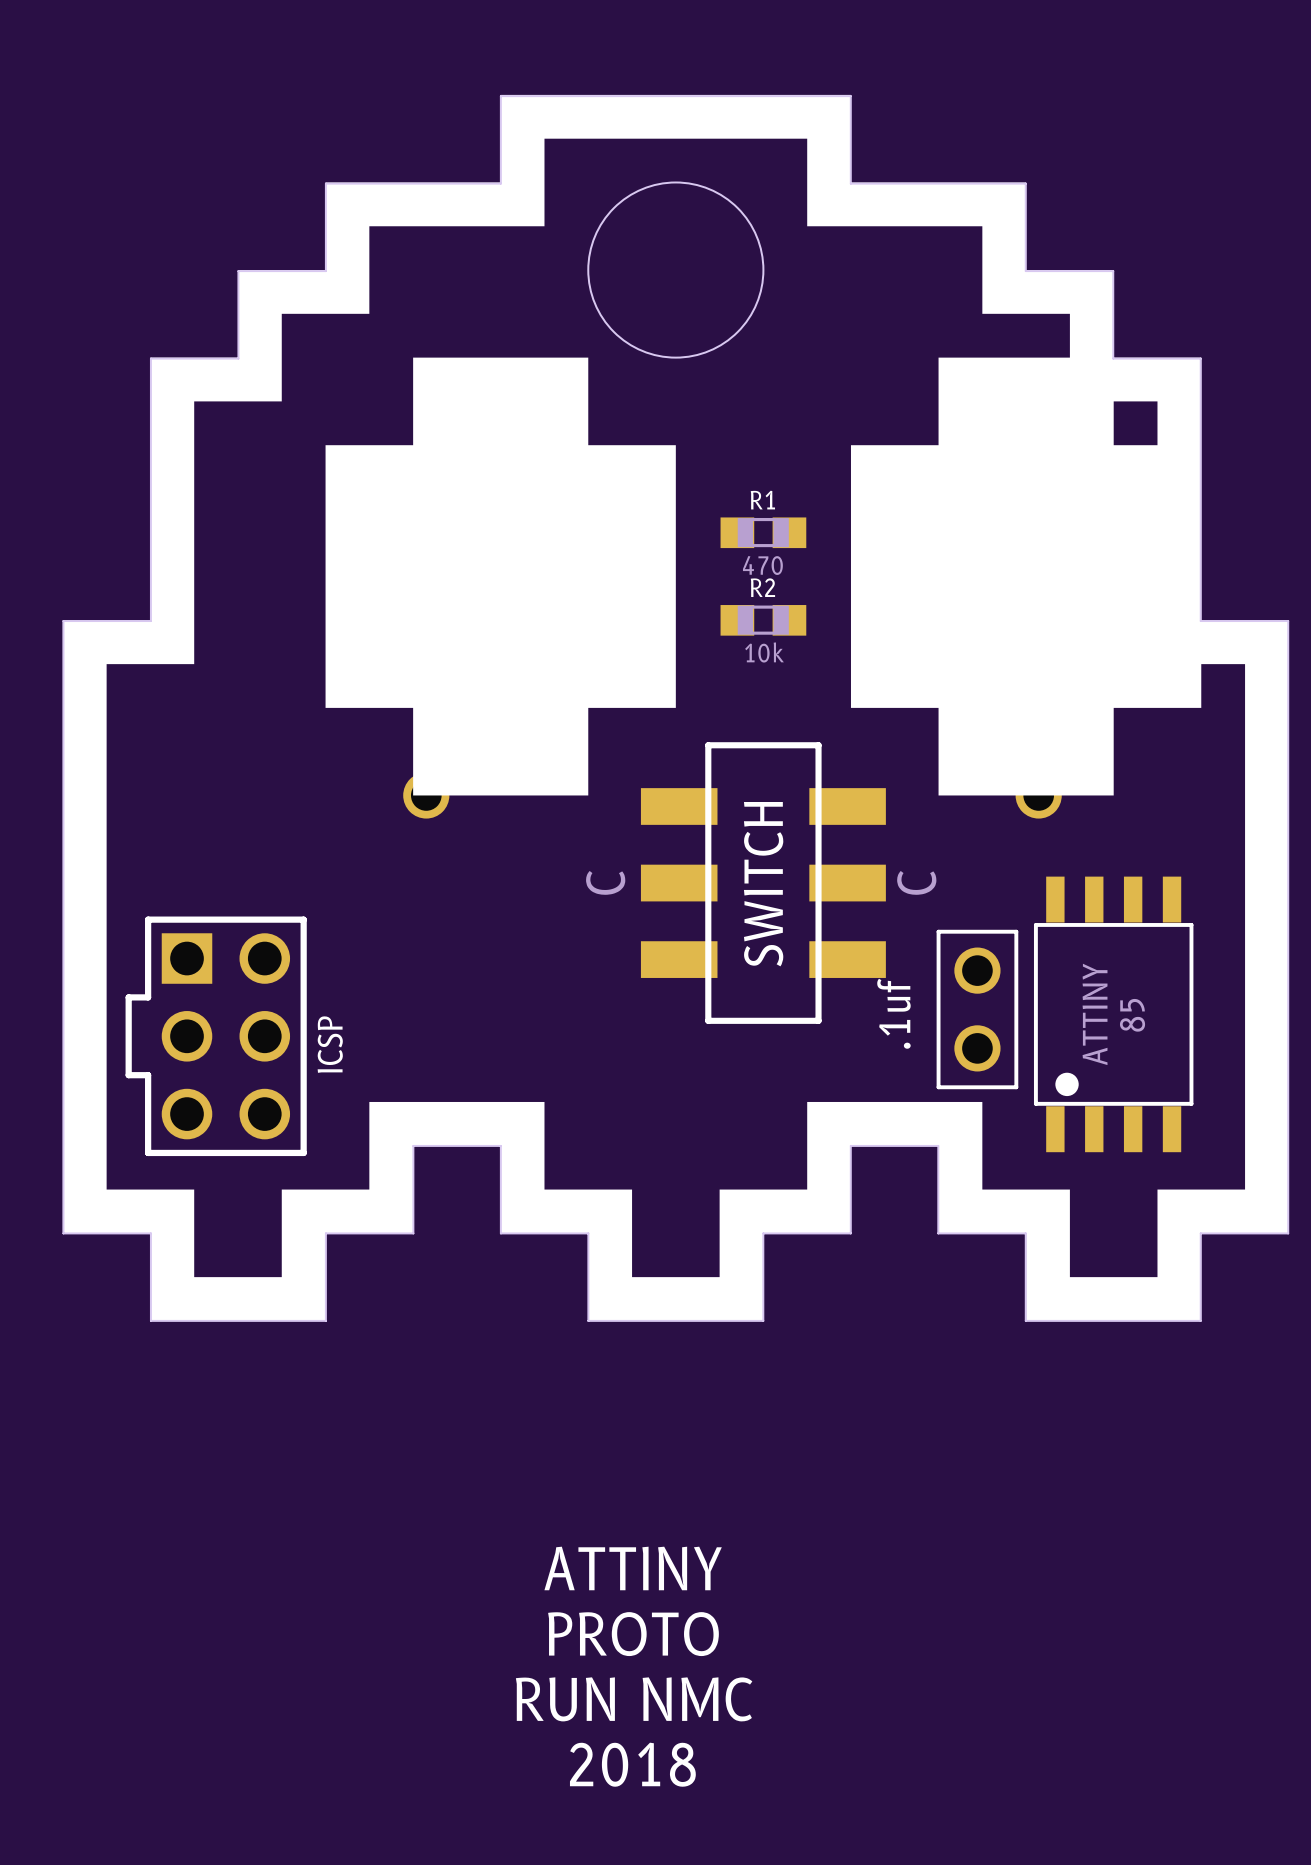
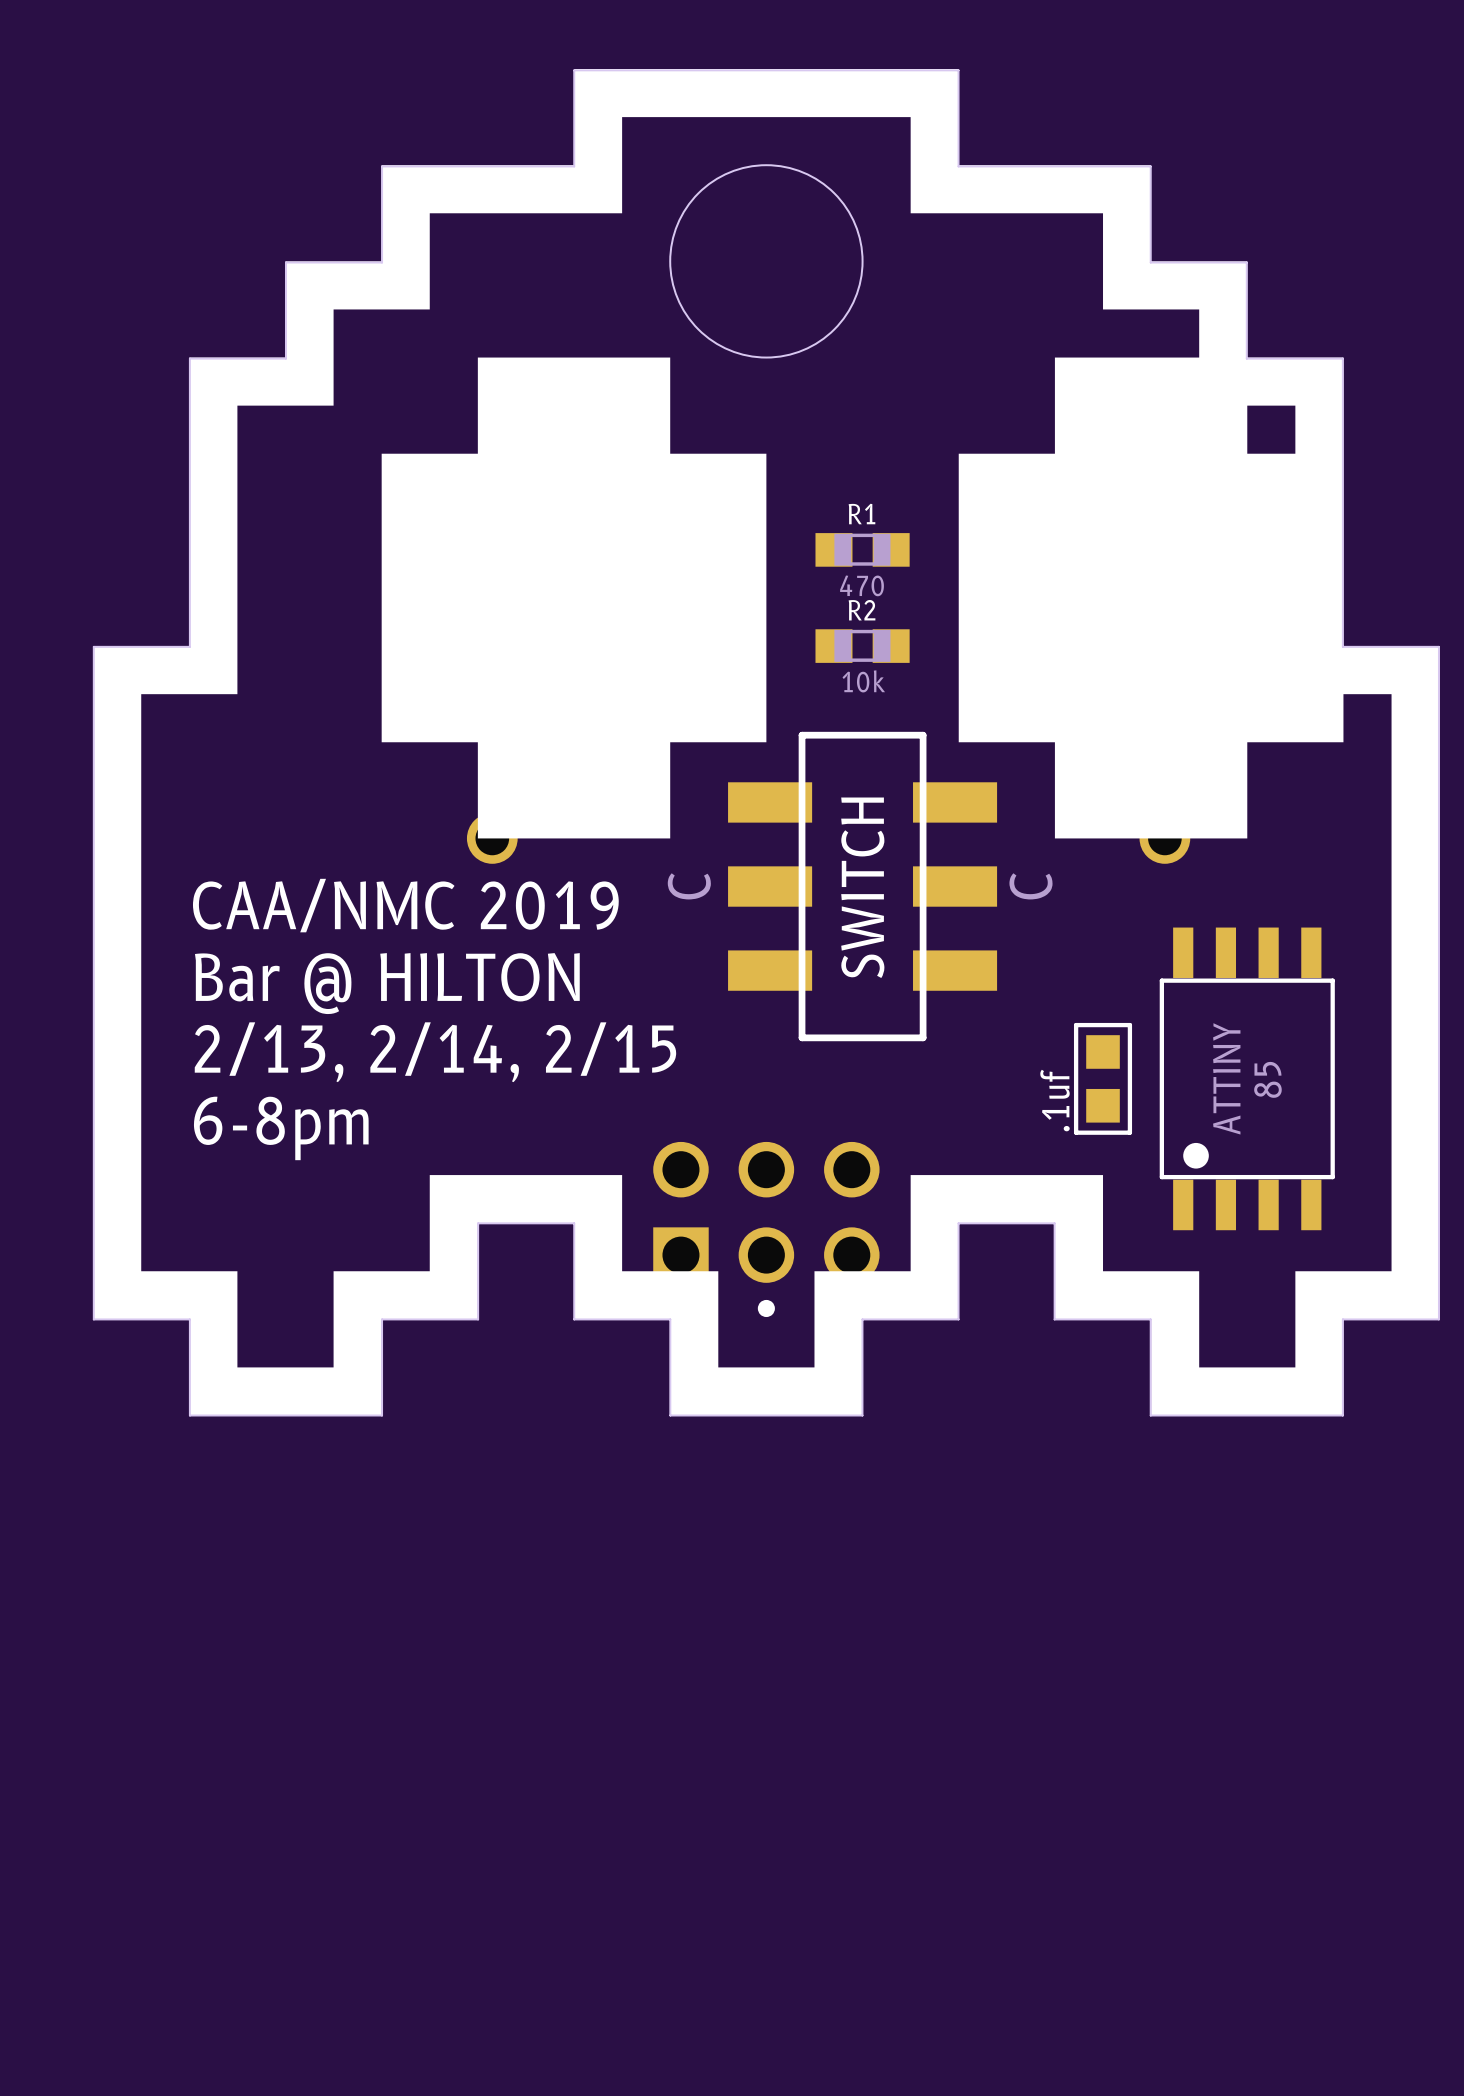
text: none -> CAA/NMC 2019 (405, 905)
part position: (763, 883) -> (862, 886)
text: none -> Bar @ HILTON (387, 983)
part footprint: [936, 929, 1019, 1090] -> [1073, 1022, 1133, 1135]
text: none -> 2/13, 2/14, 2/15 (435, 1052)
text: .1uf (893, 1013) -> none
part value: none -> .1uf (1054, 1100)
part: (216, 1036) -> none
text: none -> 6-8pm (281, 1128)
part: none -> (766, 1229)
text: ATTINY (633, 1568) -> none
text: PROTO (633, 1634) -> none
text: RUN NMC (634, 1699) -> none
text: 2018 (632, 1764) -> none

